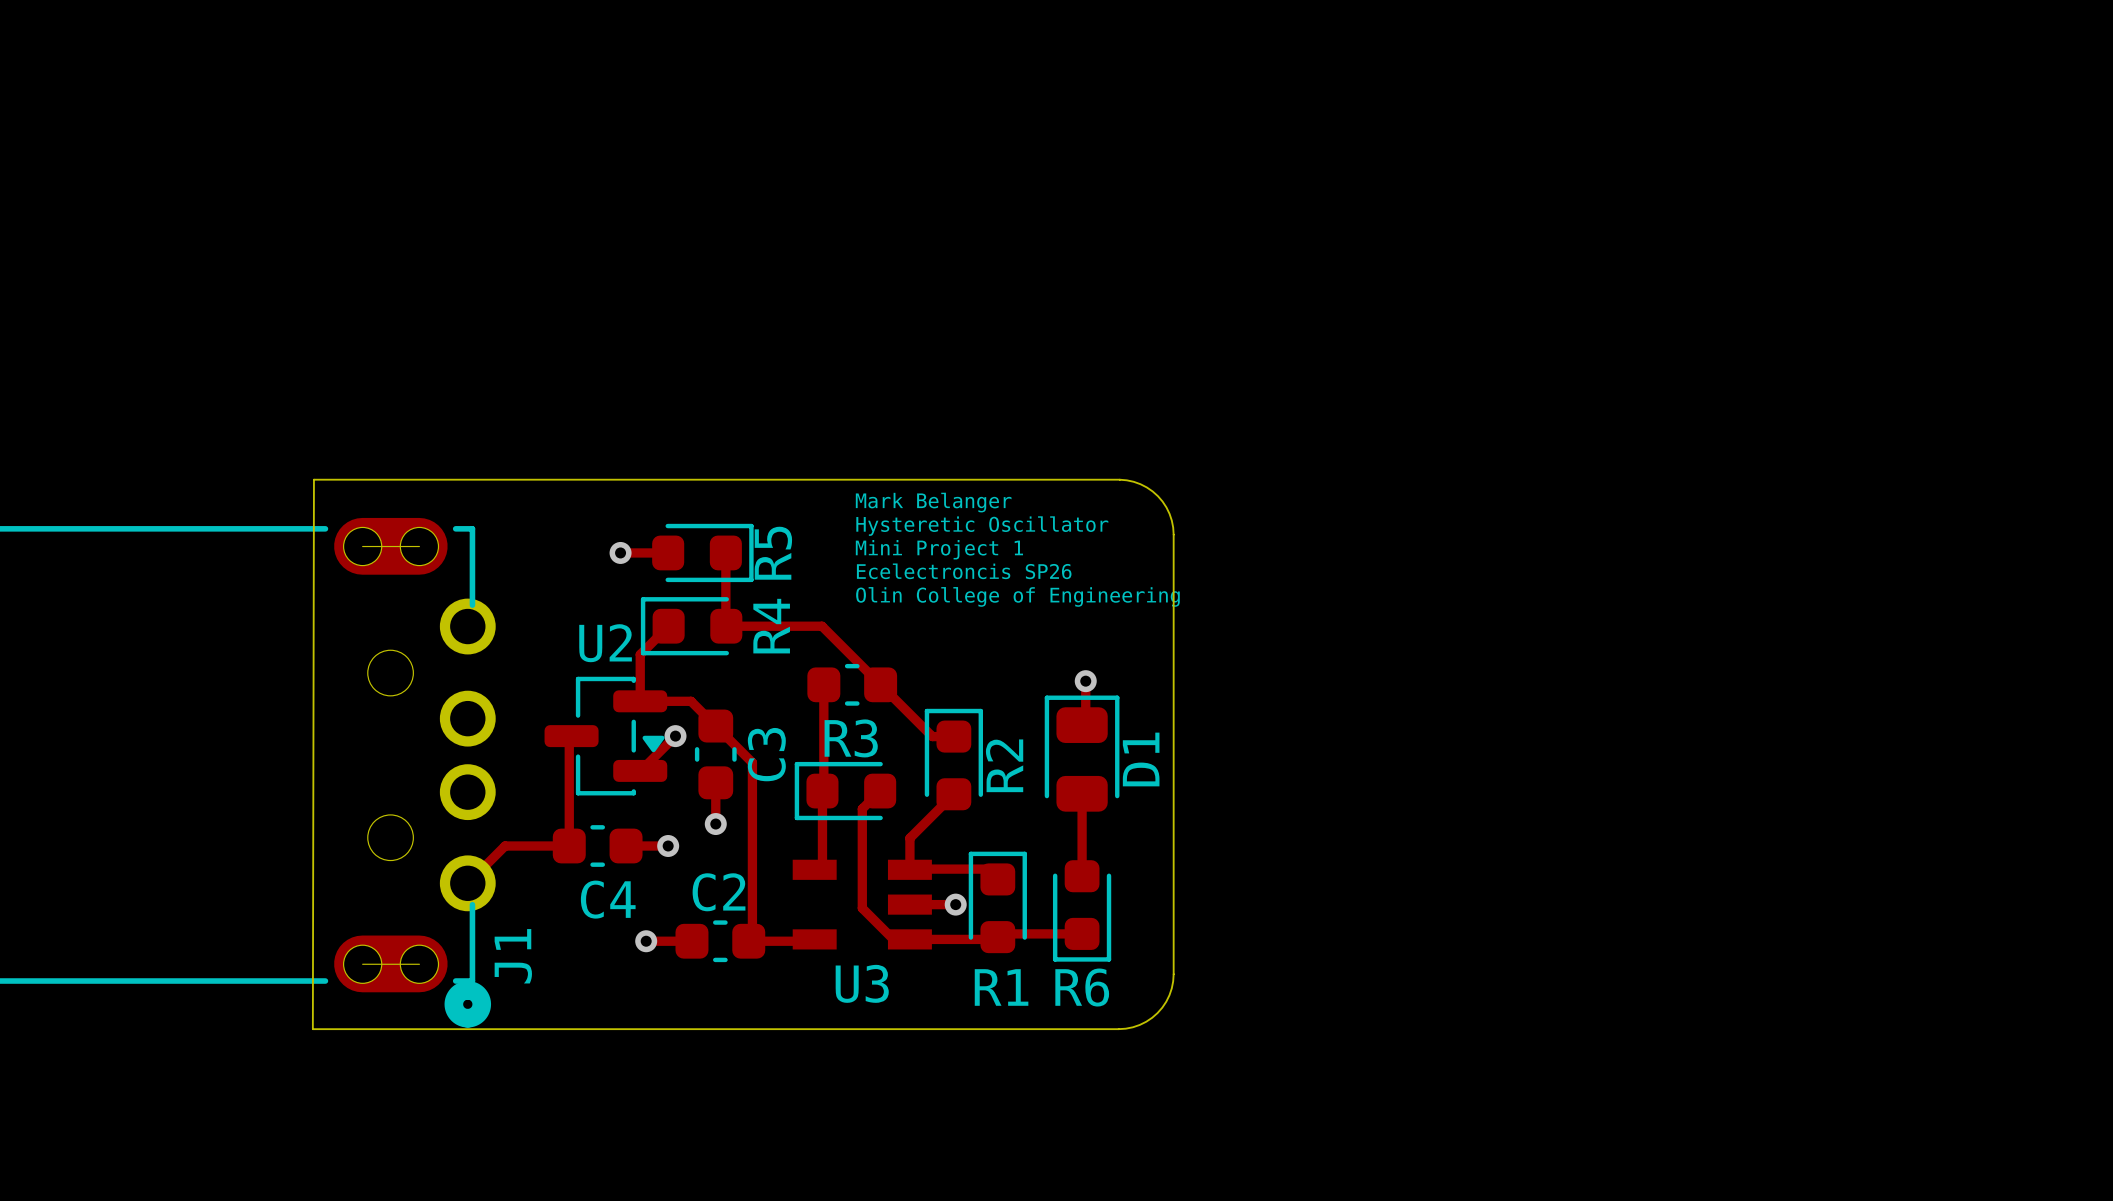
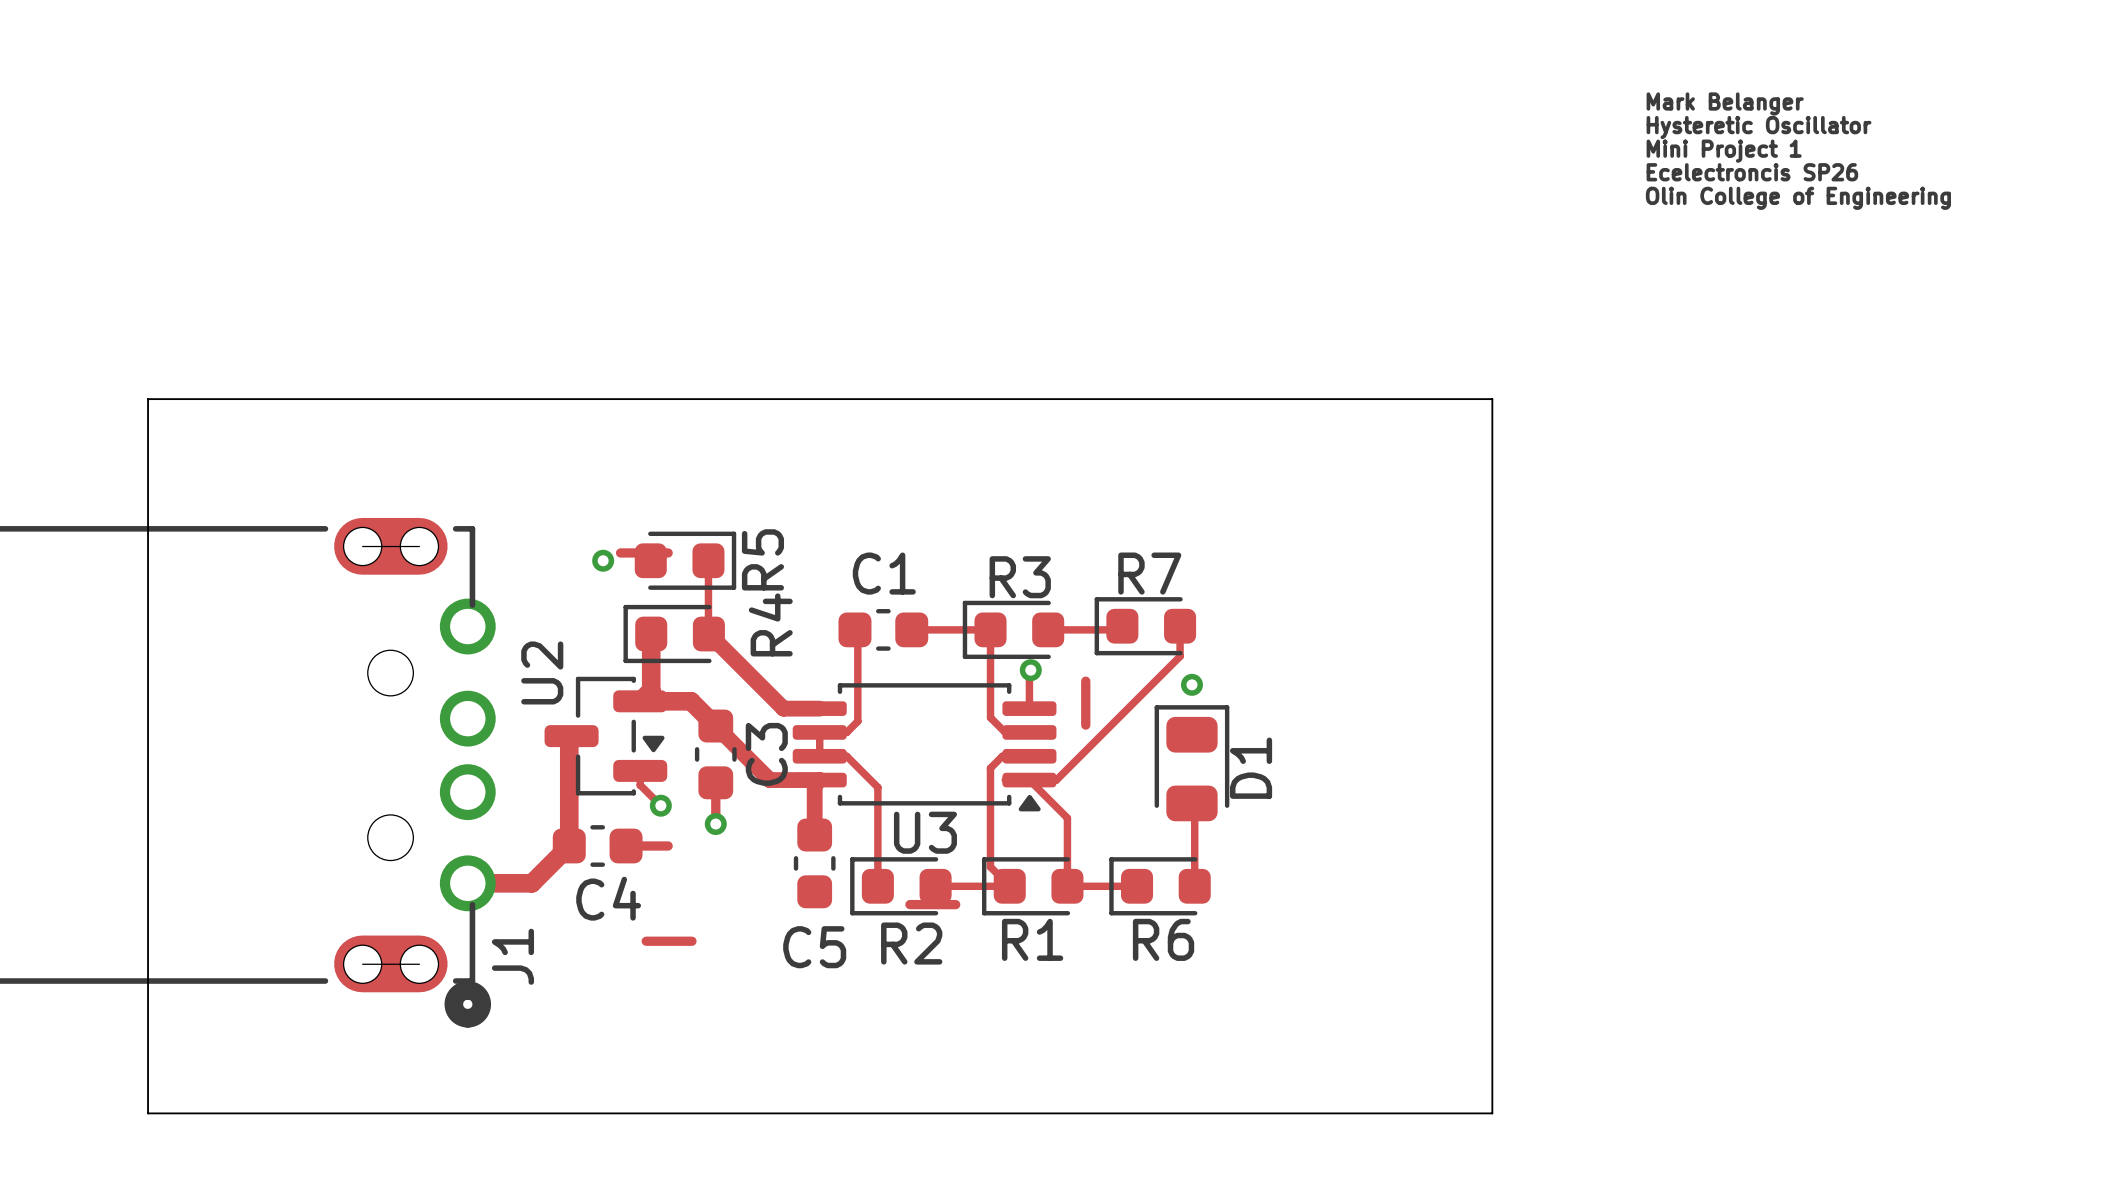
board edge: none -> (148, 399) (1492, 399) (1492, 1113) (148, 1113) (148, 399)
board edge: (313, 479) (312, 1029) (1118, 1029) (1132, 1027) (1146, 1021) (1157, 1013) (1166, 1001) (1171, 988) (1173, 974) (1173, 534) (1171, 520) (1166, 507) (1157, 496) (1146, 487) (1133, 481) (1119, 479) (313, 479) -> none
text position: Mark Belanger (933, 502) -> Mark Belanger (1725, 103)
text position: Hysteretic Oscillator (982, 526) -> Hysteretic Oscillator (1759, 127)
text position: Mini Project 1 (939, 549) -> Mini Project 1 (1724, 151)
via position: (620, 552) -> (603, 560)
R5 position: (702, 552) -> (685, 560)
track: (725, 552) (725, 625) -> (708, 560) (708, 633)
R5 name position: R5 (773, 553) -> R5 (762, 559)
text position: Ecelectroncis SP26 (964, 571) -> Ecelectroncis SP26 (1752, 172)
text position: Olin College of Engineering (1017, 596) -> Olin College of Engineering (1798, 198)
track: (668, 626) (640, 654) (640, 701) -> (651, 634) (651, 690) (640, 701)
R4 position: (691, 626) -> (674, 634)
track: (726, 626) (822, 626) (932, 736) (953, 736) -> none
track: none -> (1122, 626) (1118, 629) (1048, 629)
R7: none -> (1145, 626)
track: none -> (1180, 626) (1180, 656) (1056, 780) (1005, 780)
track: none -> (854, 629) (857, 632) (857, 721) (846, 732) (819, 732) (819, 756) (846, 756) (877, 787) (877, 886)
C1: none -> (883, 629)
track: none -> (911, 629) (990, 629) (990, 717) (1005, 732) (1029, 732)
track: none -> (719, 634) (708, 634) (783, 708) (819, 708)
U2 name rotation: 0° (605, 643) -> 90° counterclockwise (542, 672)
track: none -> (1030, 670) (1029, 708)
via: none -> (1030, 670)
via: (1085, 681) -> none
track: (823, 684) (822, 862) (814, 869) -> none
part: (852, 684) -> none
via: none -> (1191, 684)
track width: thin (640, 701) (691, 701) (752, 762) -> thick (640, 701) (691, 701) (752, 762)
track width: thin (571, 736) (569, 738) (569, 846) -> thick (571, 736) (569, 738) (569, 846)
track: (675, 736) (640, 770) -> (660, 805) (640, 785) (640, 770)
via: (675, 736) -> none
D1 position: (1082, 753) -> (1191, 763)
track: none -> (1029, 756) (1002, 756) (990, 768) (990, 867) (1009, 886) (935, 886)
R2 rotation: 0° (953, 759) -> 90° counterclockwise (900, 886)
R2 position: (953, 759) -> (900, 886)
track: (752, 762) (752, 937) (748, 941) (812, 941) (814, 939) -> (752, 762) (769, 780) (819, 780) (814, 785) (814, 835)
track: none -> (1029, 780) (1067, 818) (1067, 886) (1137, 886)
R3 position: (845, 791) -> (1013, 629)
track: (880, 791) (862, 808) (862, 908) (893, 939) (999, 939) (1001, 937) -> none
track: (1082, 793) (1082, 876) -> none
track: (953, 794) (909, 838) (909, 869) (991, 869) (1001, 879) -> none
track: none -> (1191, 803) (1194, 806) (1194, 886)
via: none -> (660, 805)
track: (569, 846) (505, 846) (467, 883) -> (569, 846) (531, 883) (467, 883)
via: (668, 846) -> none
U3 footprint: [792, 859, 932, 950] -> [792, 683, 1057, 812]
C5: none -> (814, 863)
R1 rotation: 0° (997, 902) -> 90° counterclockwise (1032, 886)
via: (955, 904) -> none
R6 rotation: 0° (1082, 910) -> 90° clockwise (1160, 886)
R6 position: (1082, 910) -> (1160, 886)
track: (1082, 933) (1001, 933) (997, 937) -> none
via: (646, 941) -> none
C2: (720, 941) -> none

